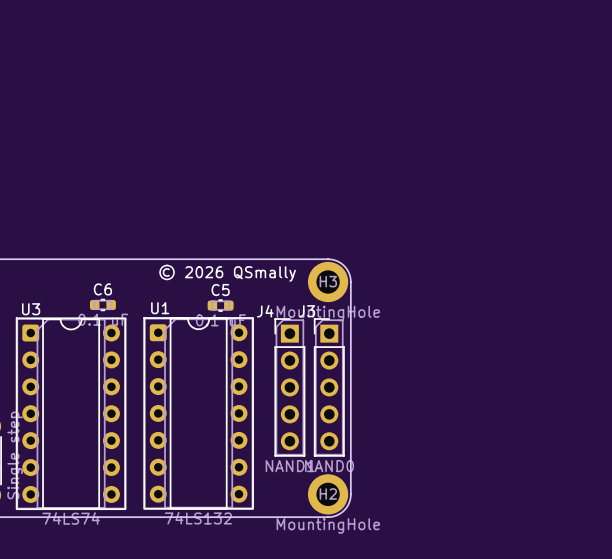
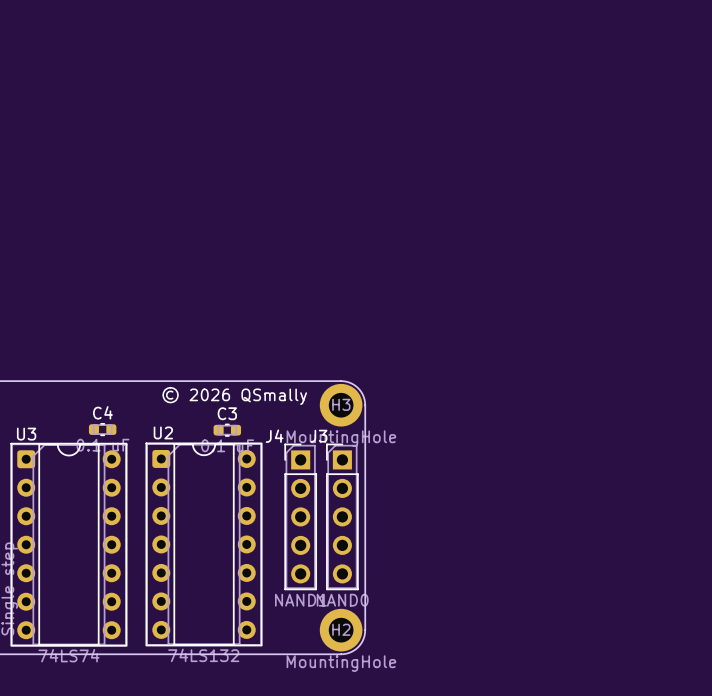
C6 name: C6 (102, 289) -> C4 (102, 412)
C5 name: C5 (220, 290) -> C3 (227, 413)
U1 name: U1 (160, 308) -> U2 (163, 432)

